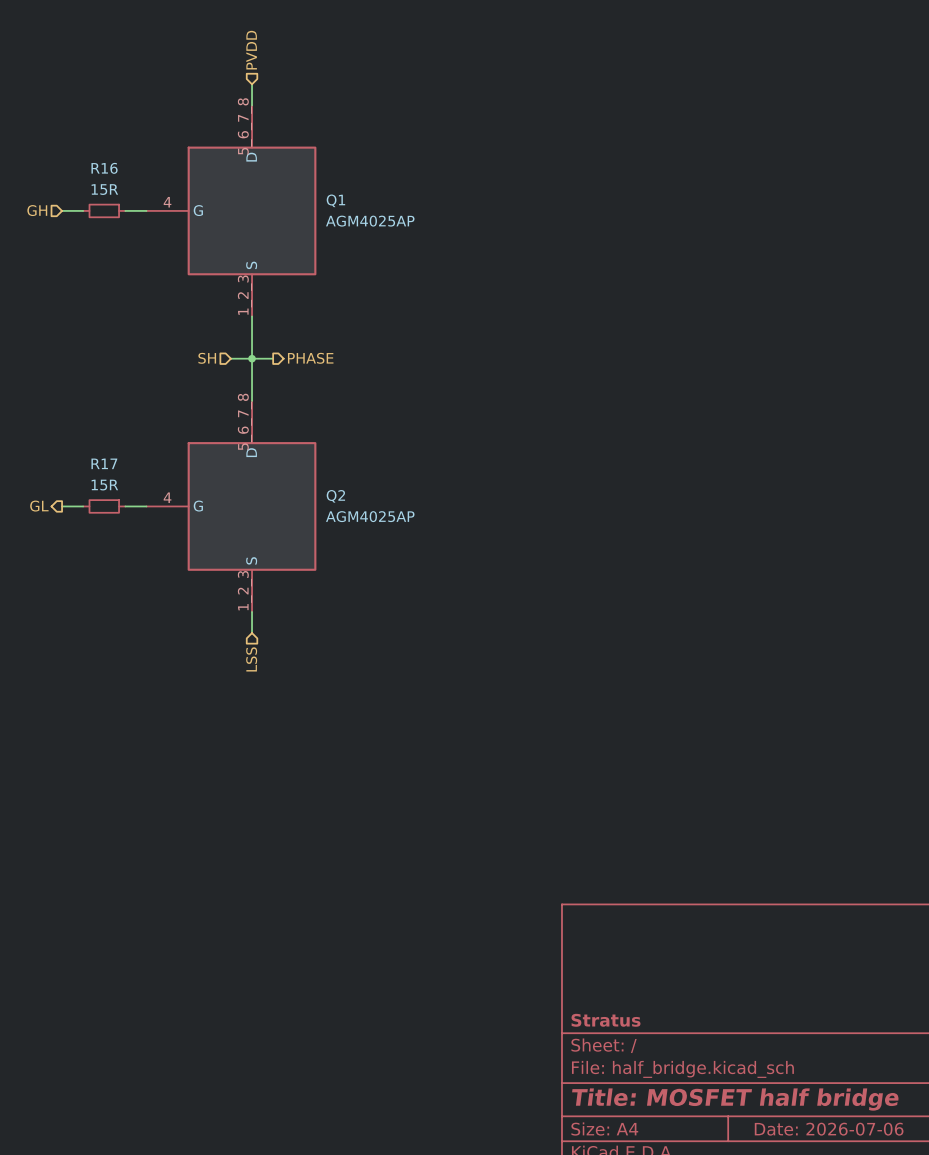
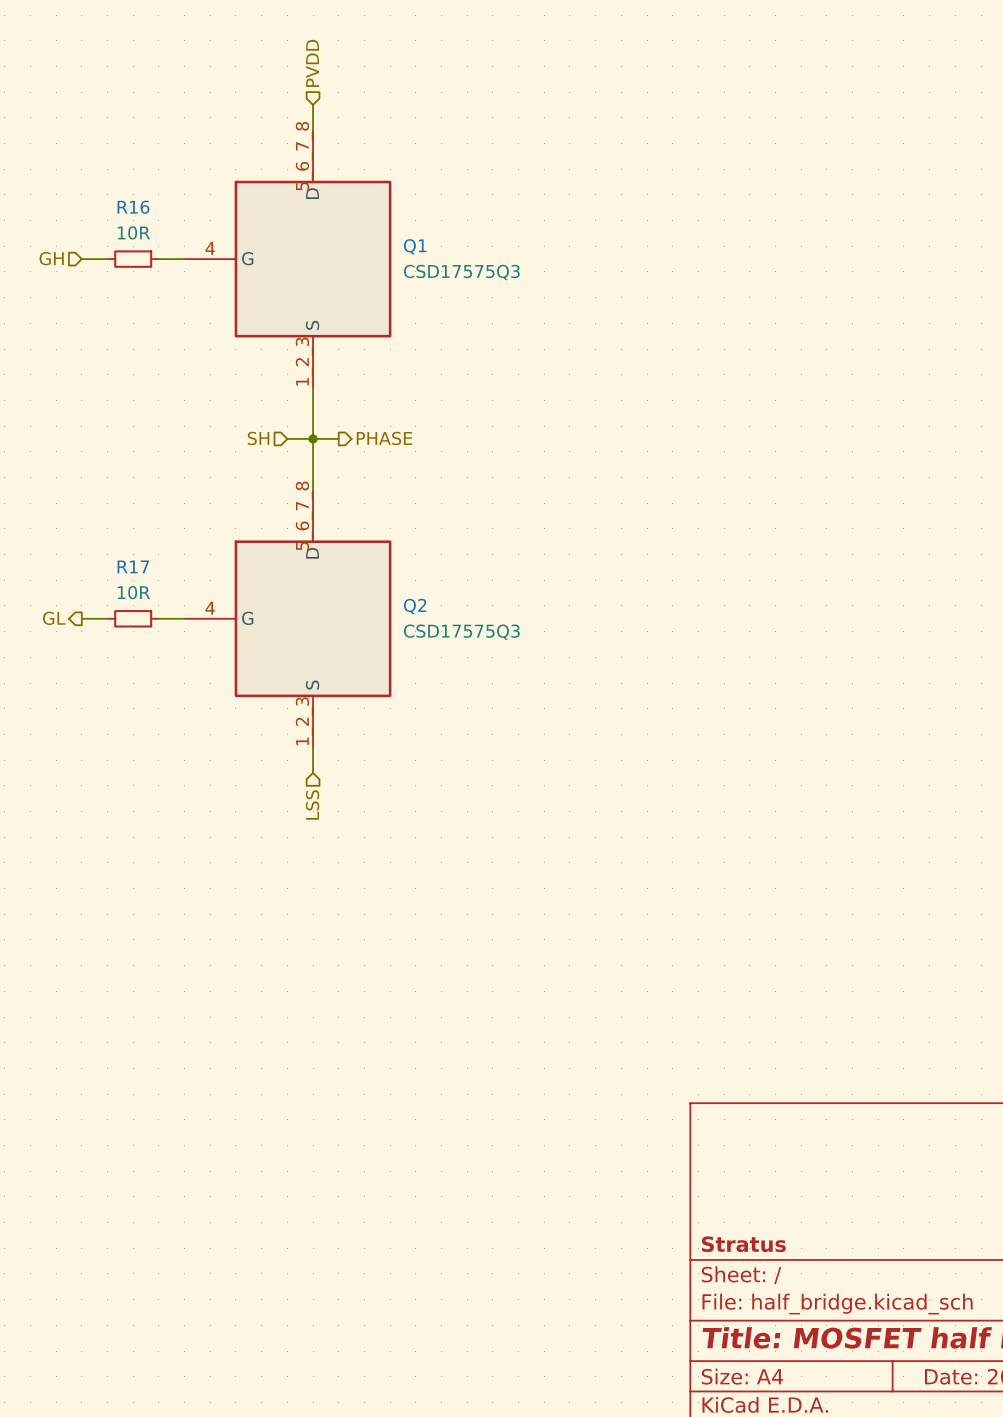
R16 value: 15R (104, 189) -> 10R (133, 232)
Q1 value: AGM4025AP (370, 221) -> CSD17575Q3 (461, 272)
R17 value: 15R (104, 485) -> 10R (133, 592)
Q2 value: AGM4025AP (370, 516) -> CSD17575Q3 (461, 632)

